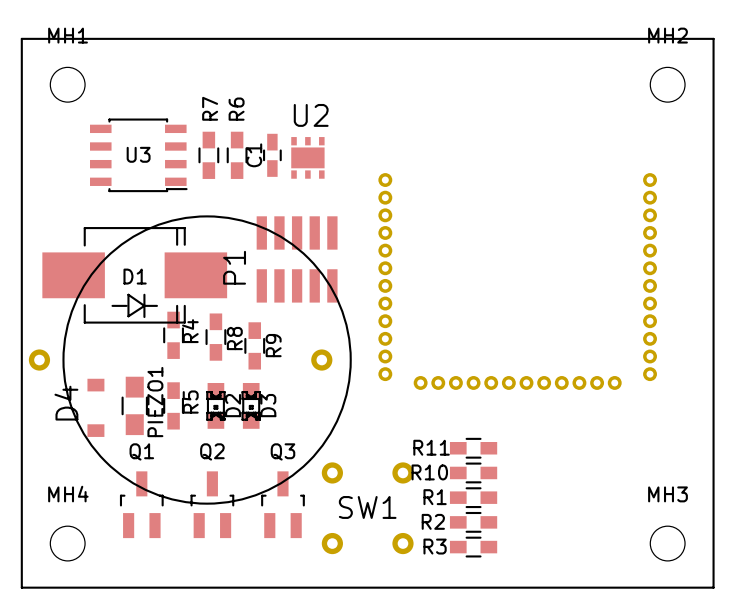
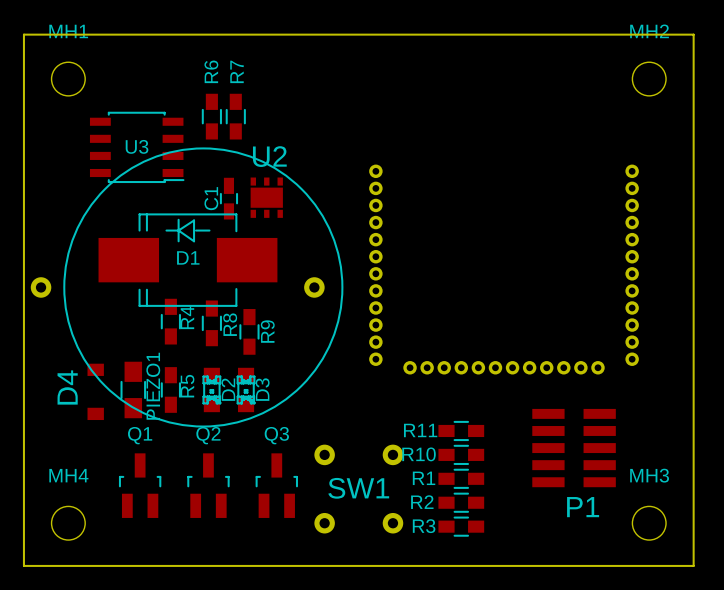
R7 position: (208, 155) -> (235, 116)
R6 position: (237, 155) -> (211, 116)
C1 position: (272, 155) -> (228, 198)
U2 position: (307, 157) -> (266, 197)
P1 rotation: 0° (297, 259) -> 90° clockwise (574, 448)
P1 position: (297, 259) -> (574, 448)
P1 name position: P1 (234, 267) -> P1 (583, 507)
D1 rotation: 0° (134, 275) -> 180° (187, 260)
part position: (190, 360) -> (187, 287)

